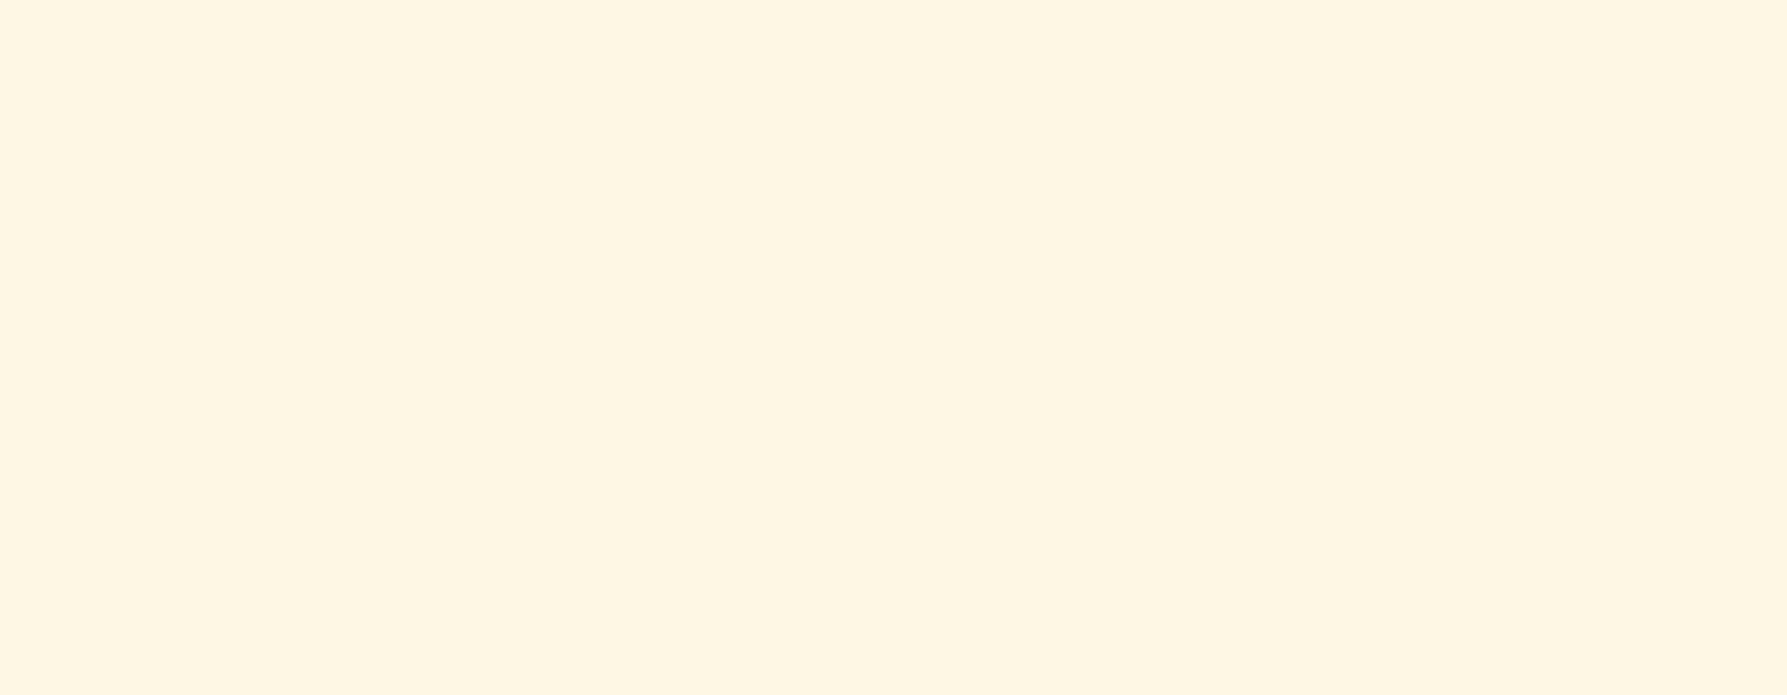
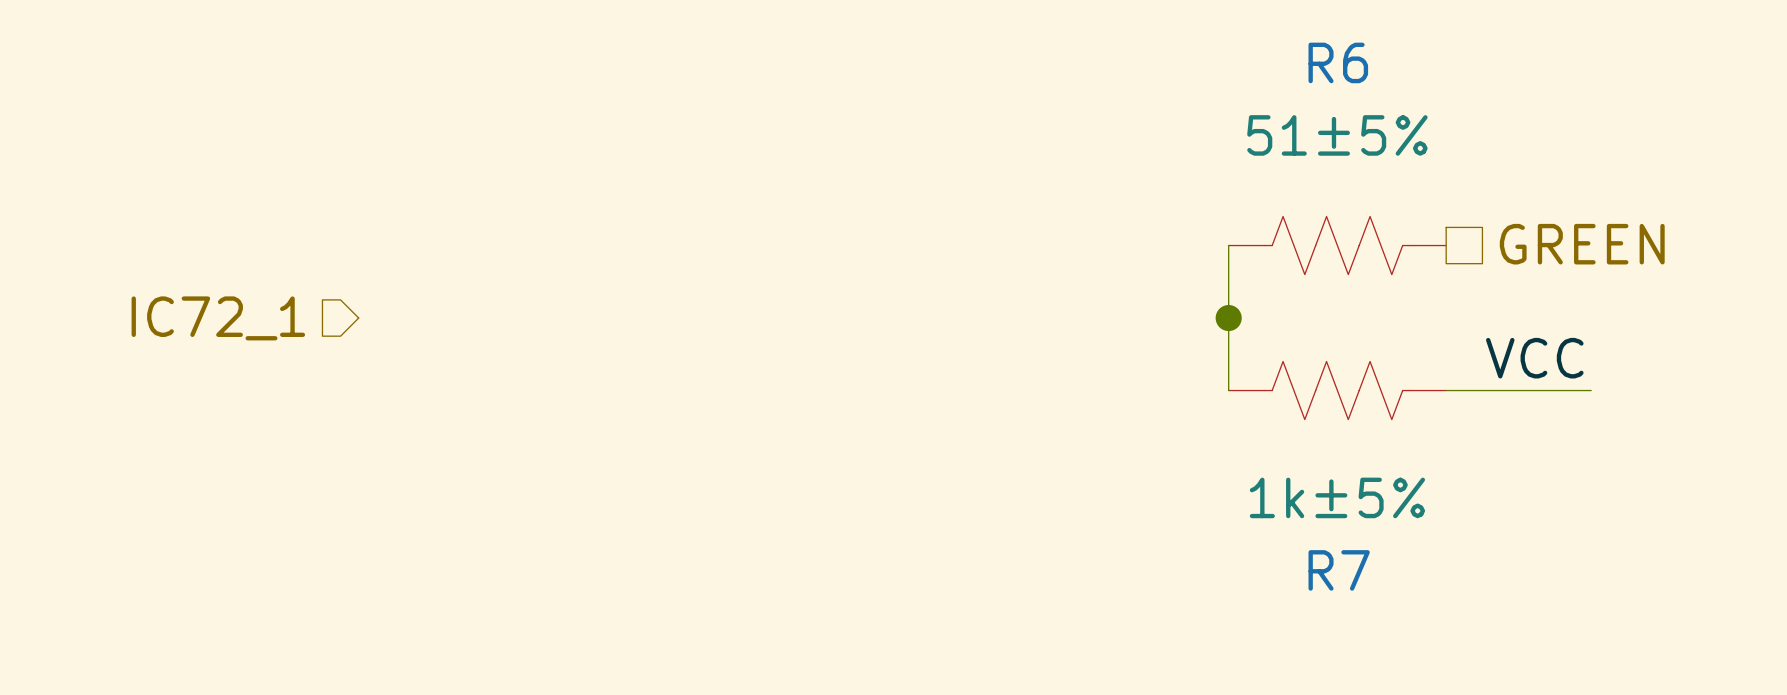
hierarchical label: none -> GREEN (1582, 244)
wire: none -> (1228, 245) (1228, 390)
R6: none -> 51±5% (1337, 245)
hierarchical label: none -> IC72_1 (218, 318)
junction: none -> (1228, 318)
label: none -> VCC (1534, 358)
R7: none -> 1k±5% (1337, 390)
wire: none -> (1446, 390) (1591, 390)

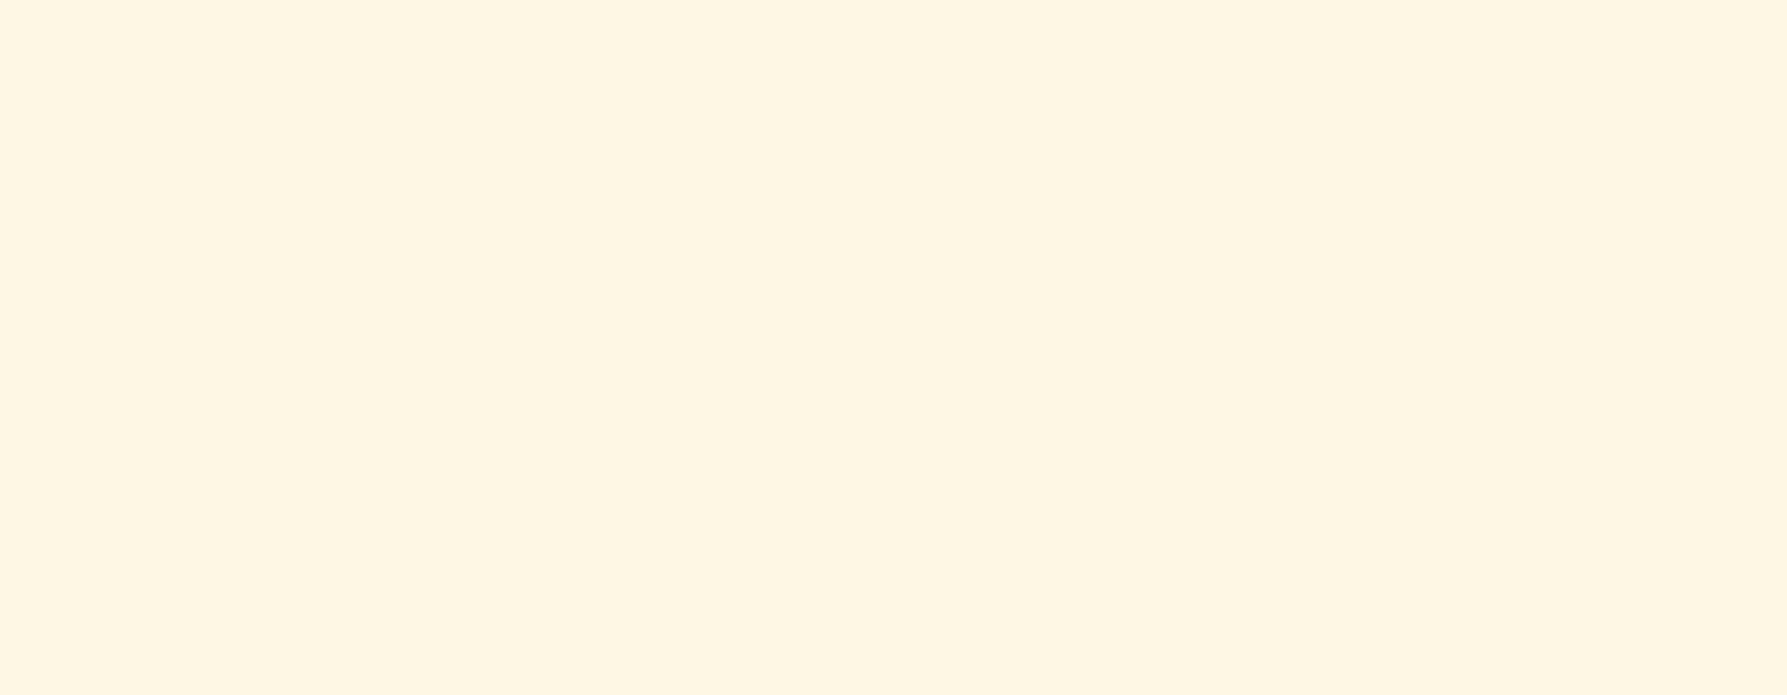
hierarchical label: GREEN (1582, 244) -> none
wire: (1228, 245) (1228, 390) -> none
R6: 51±5% (1337, 245) -> none
hierarchical label: IC72_1 (218, 318) -> none
junction: (1228, 318) -> none
label: VCC (1534, 358) -> none
R7: 1k±5% (1337, 390) -> none
wire: (1446, 390) (1591, 390) -> none

